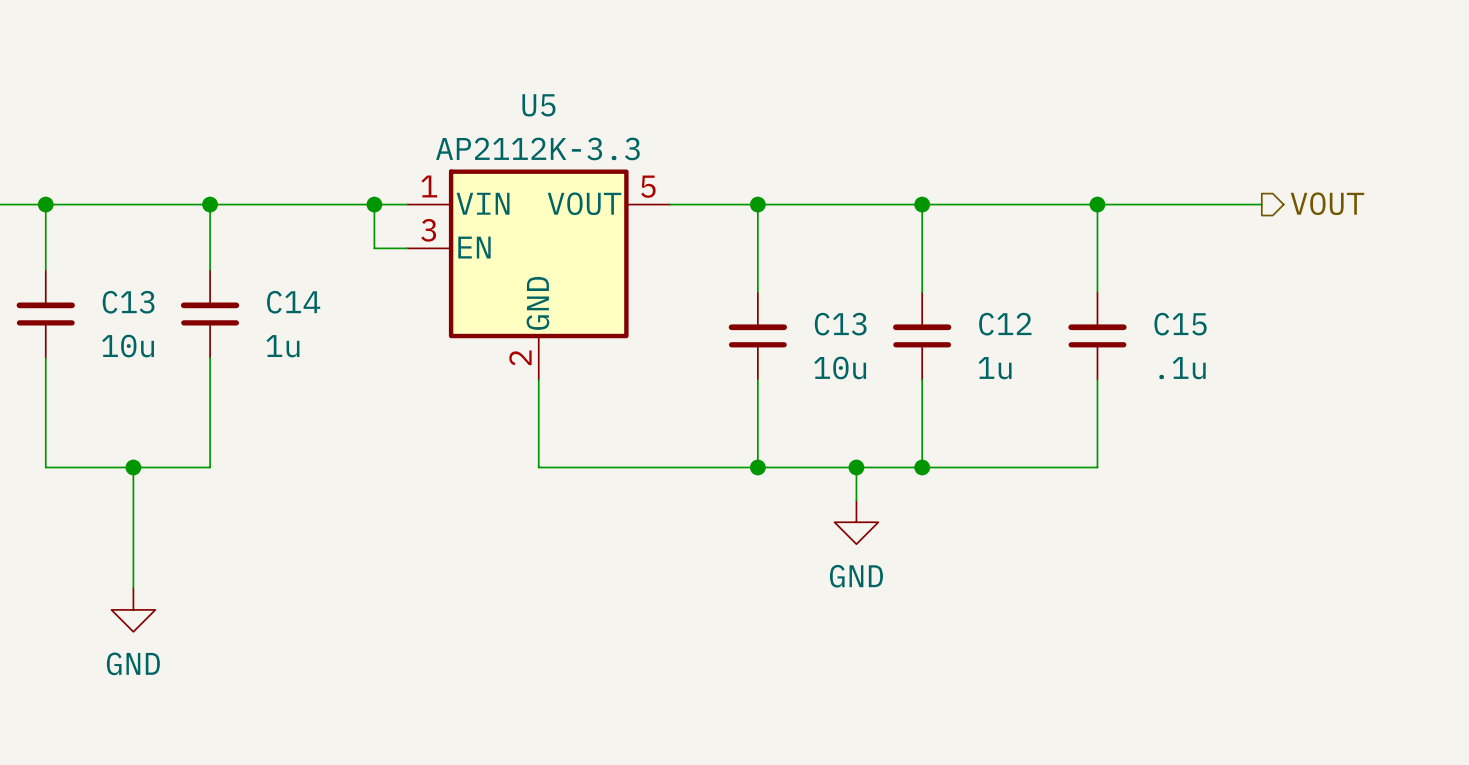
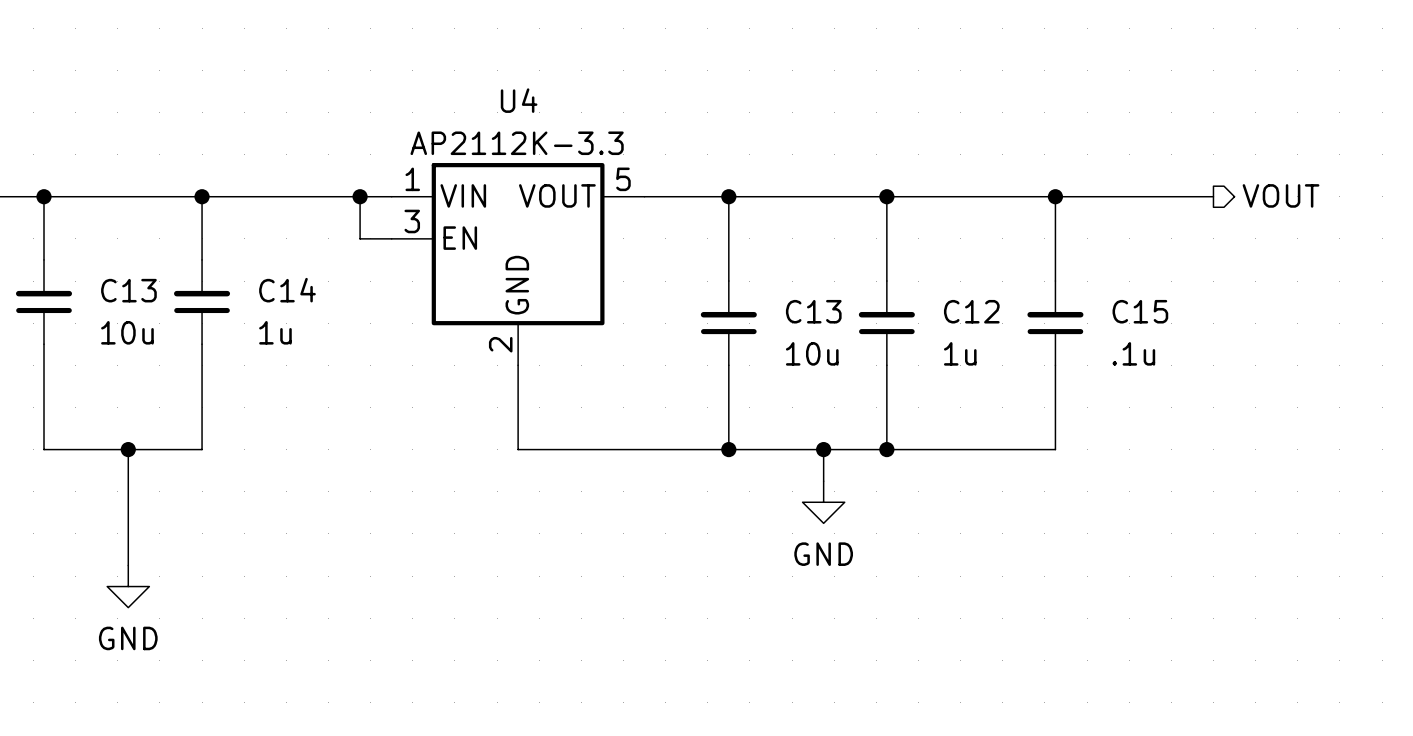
U5 name: U5 (538, 105) -> U4 (519, 100)

